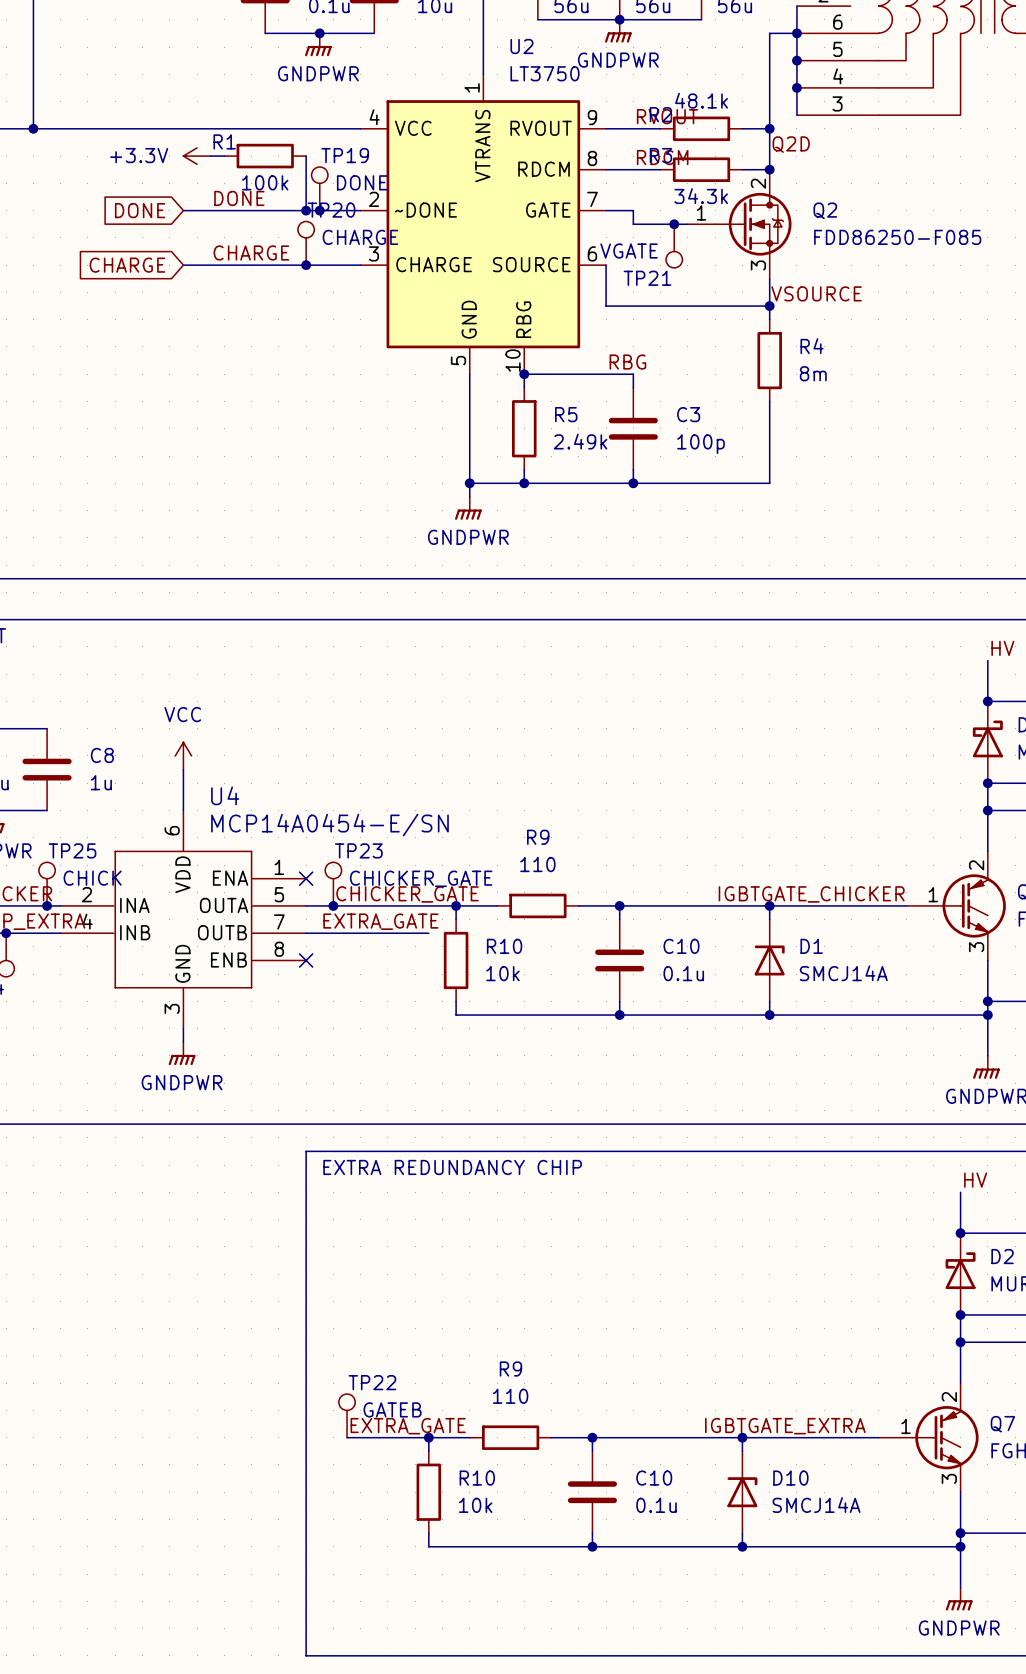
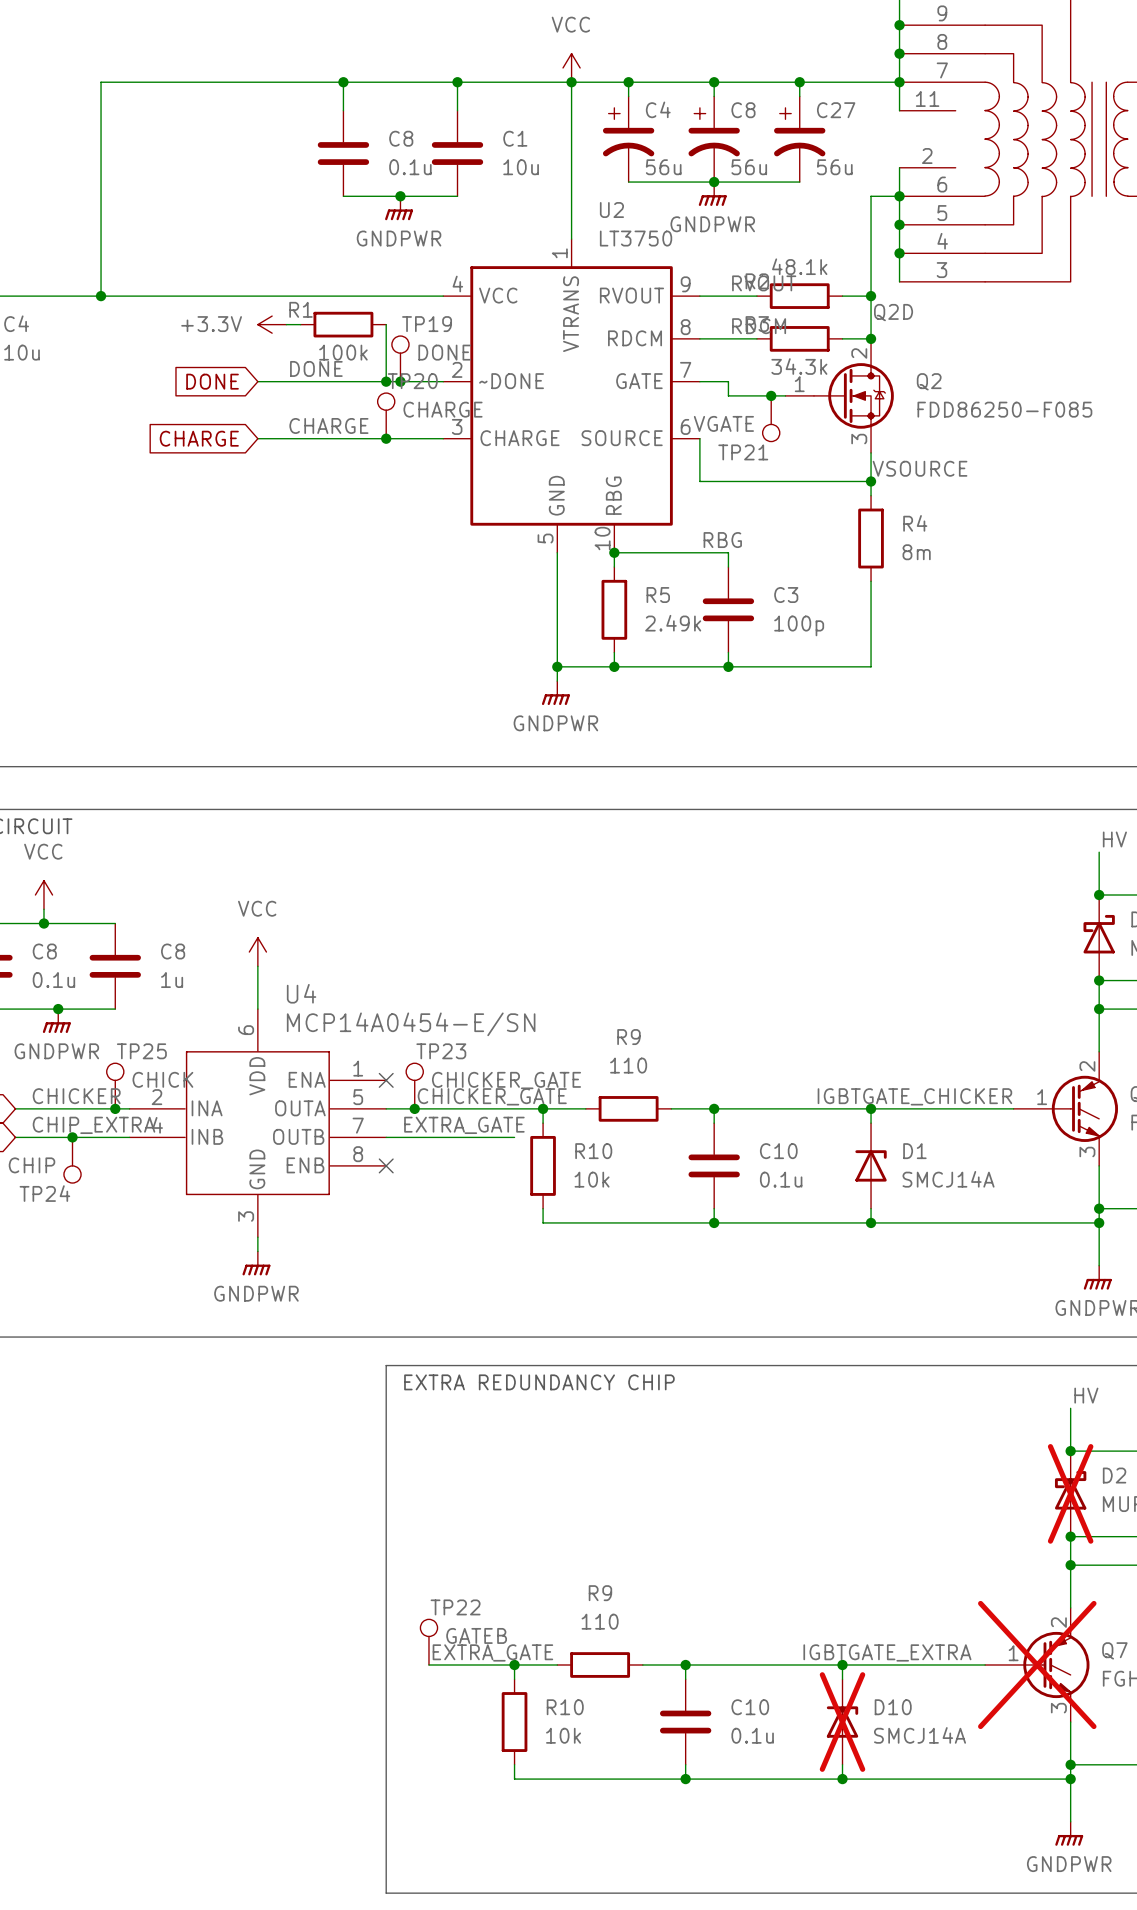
D2 do-not-place cross: none -> (1070, 1493)
Q7 do-not-place cross: none -> (1037, 1664)
D10 do-not-place cross: none -> (842, 1722)

